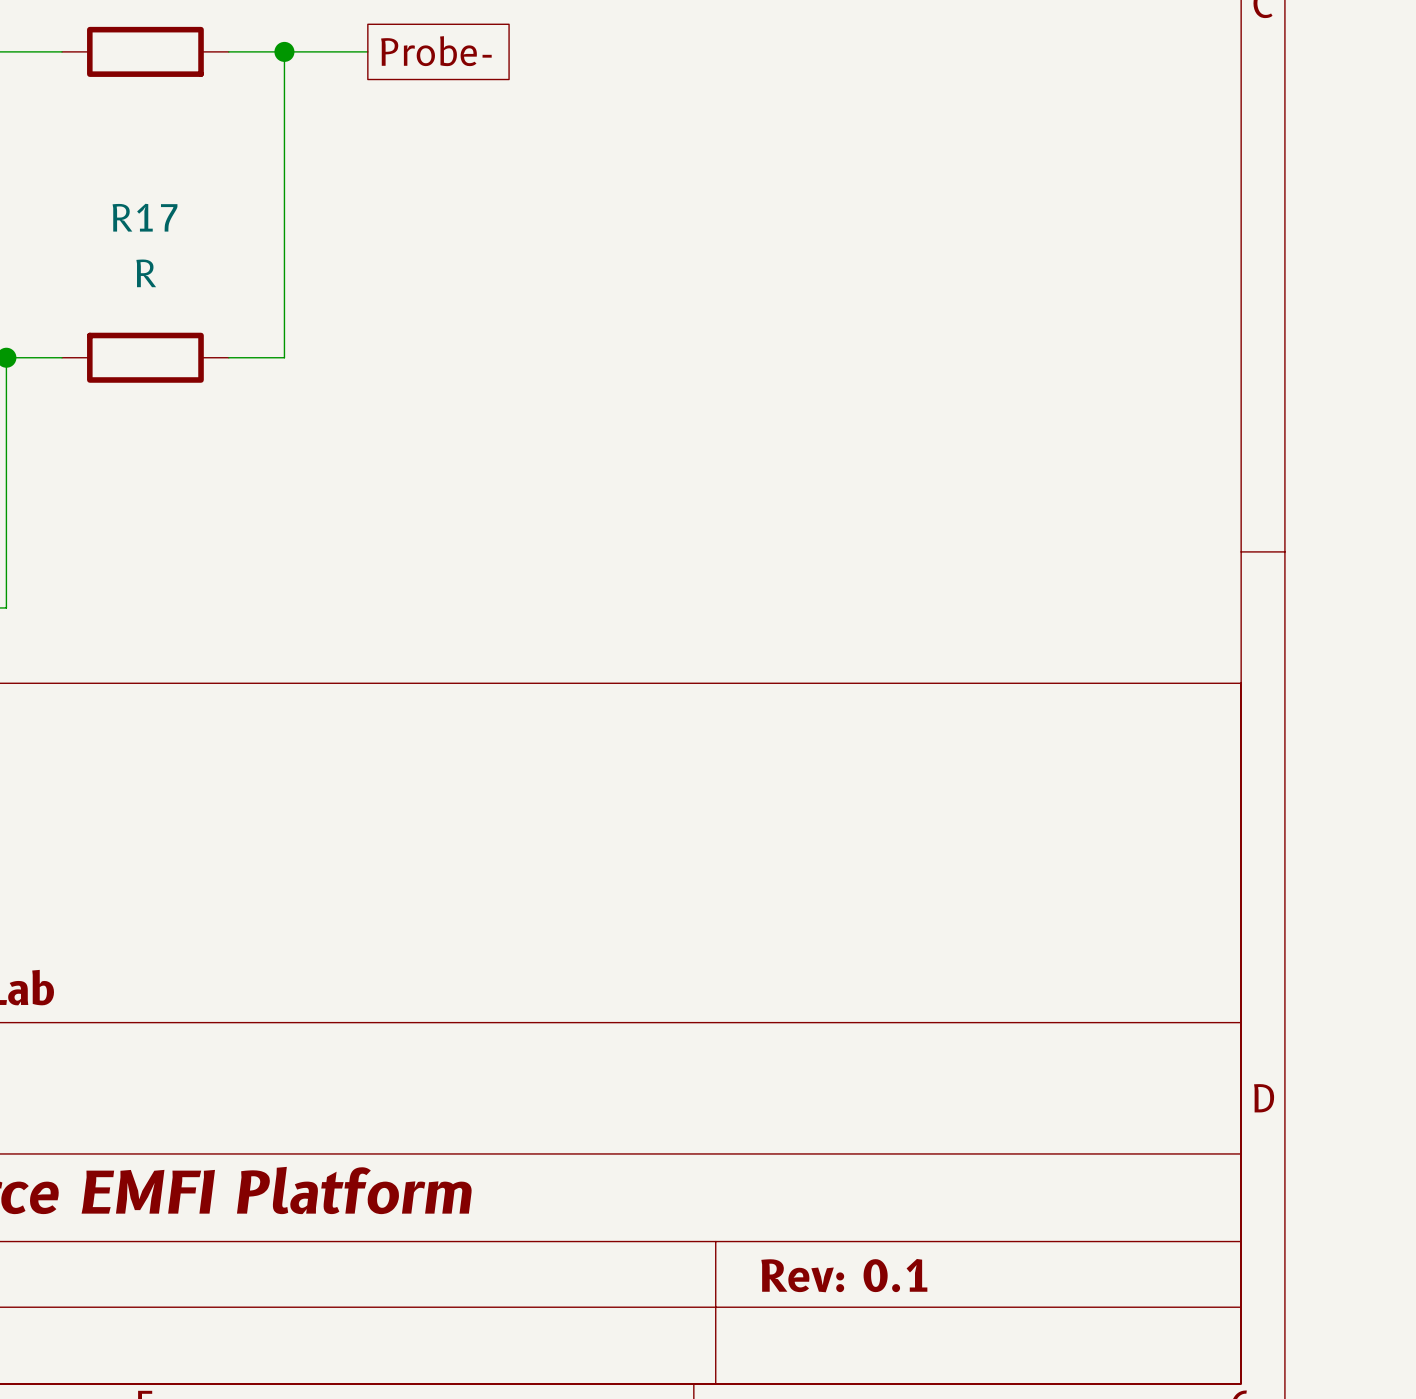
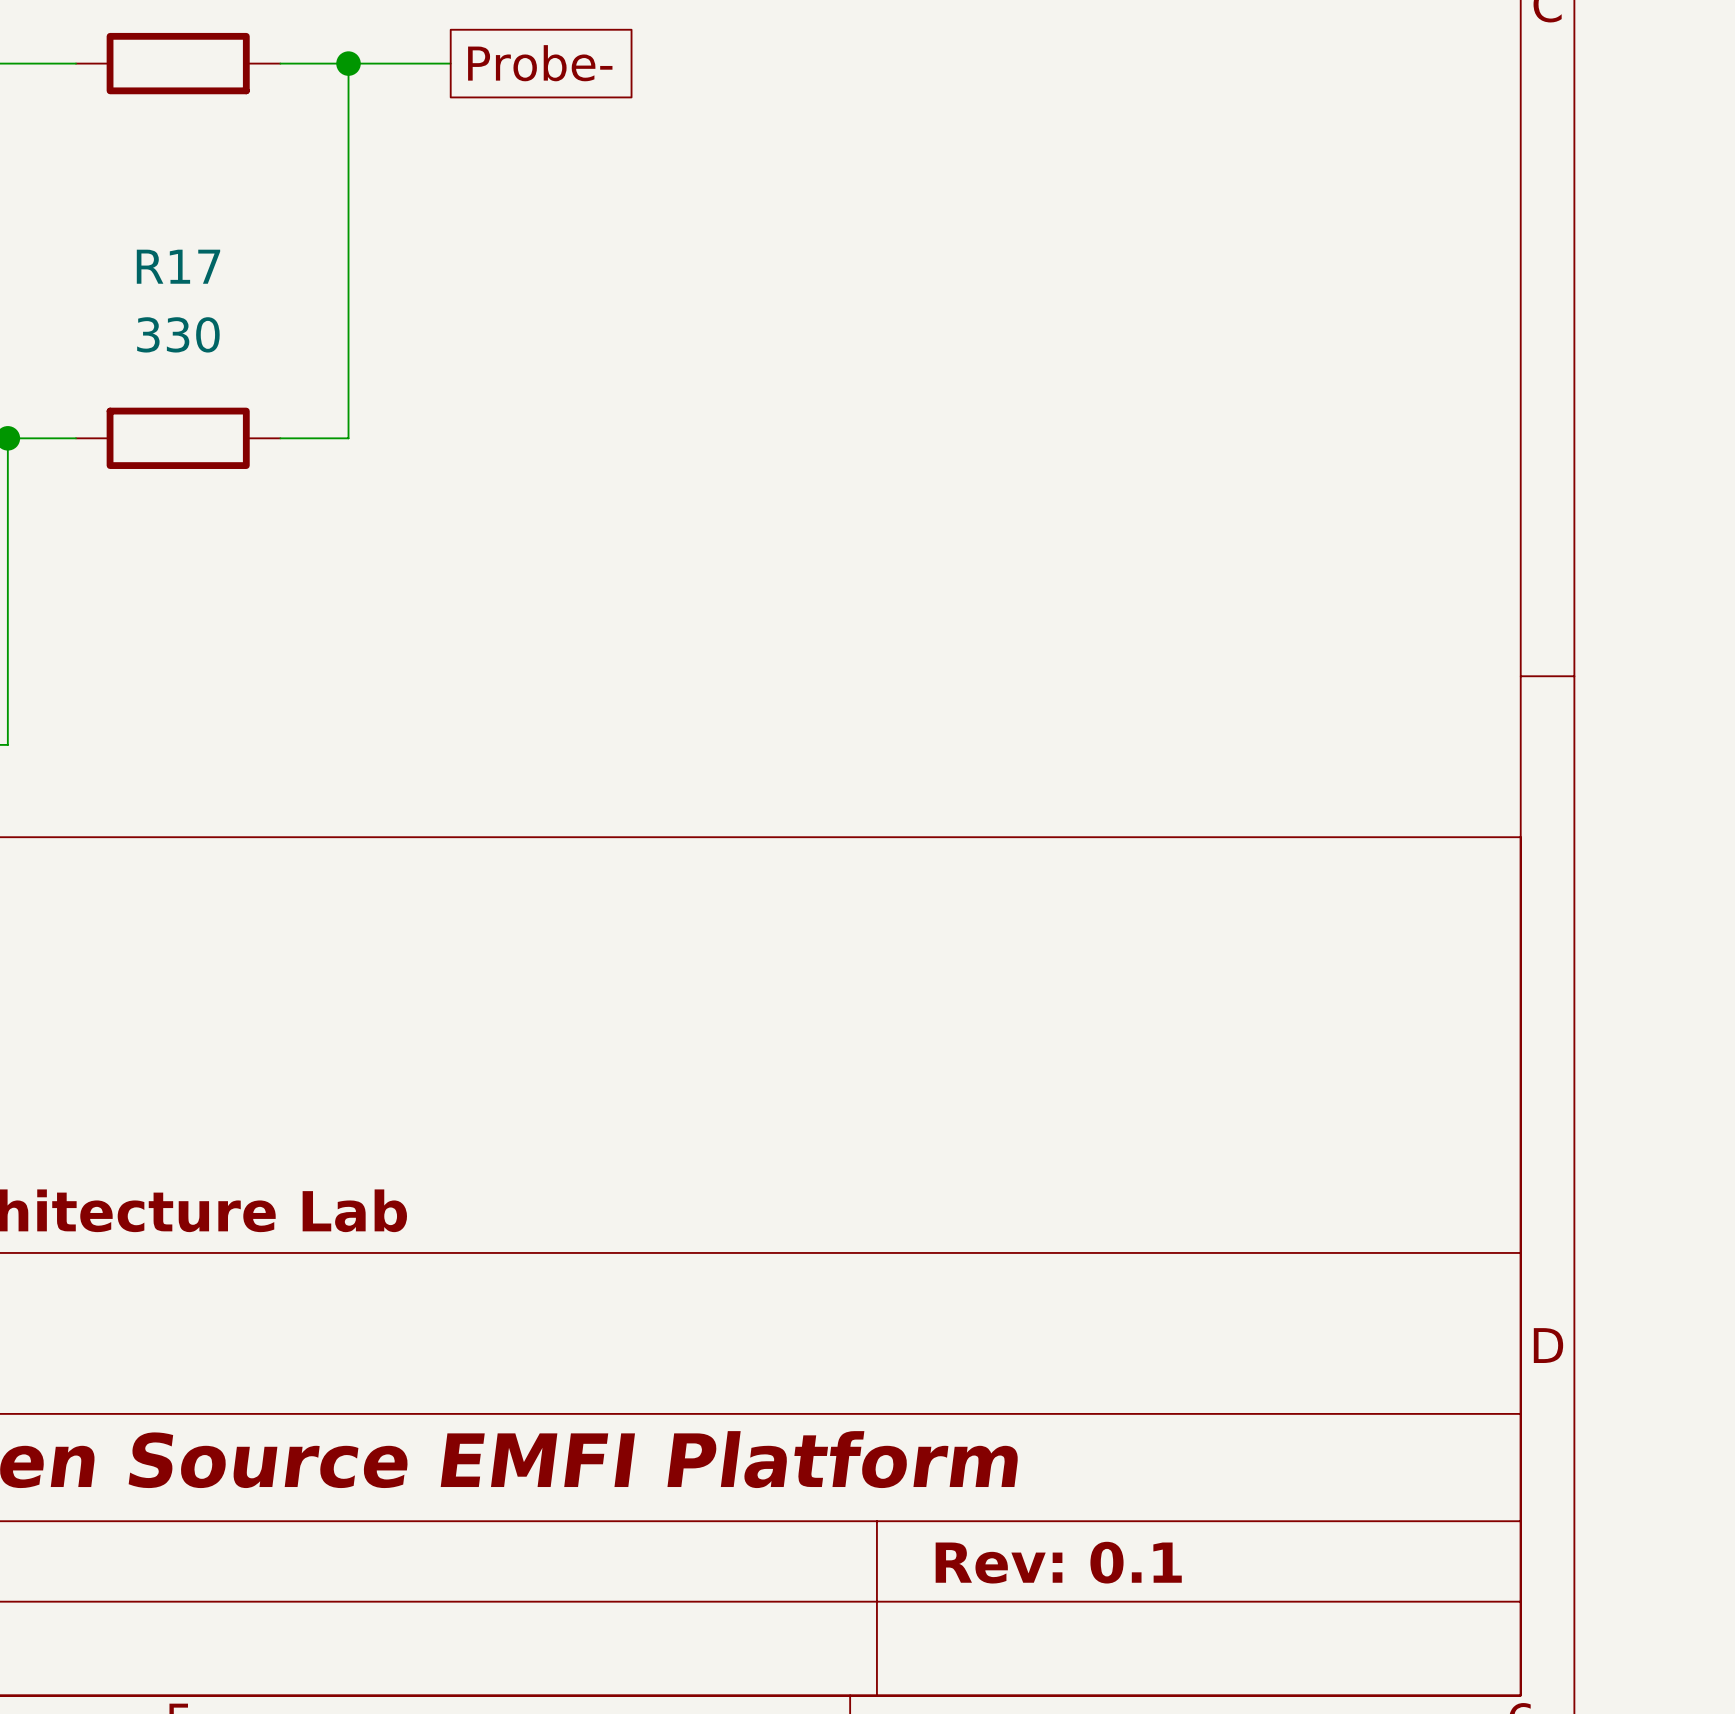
R17 value: R (146, 273) -> 330 (178, 334)

